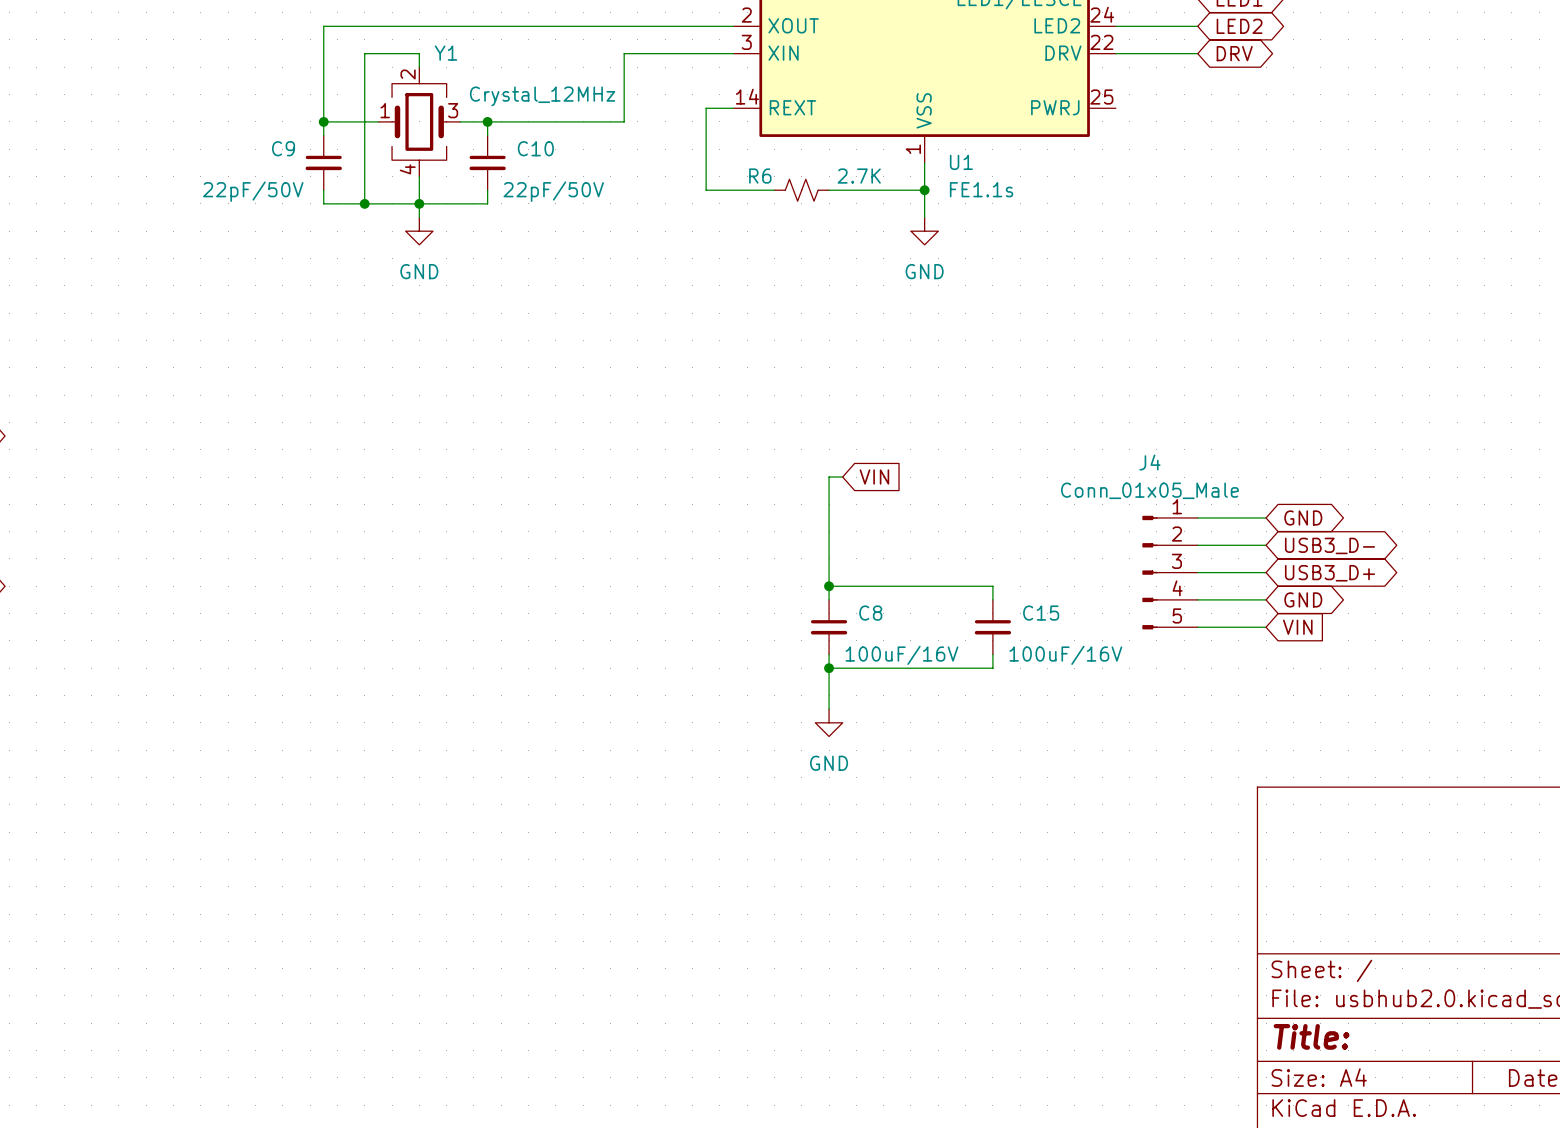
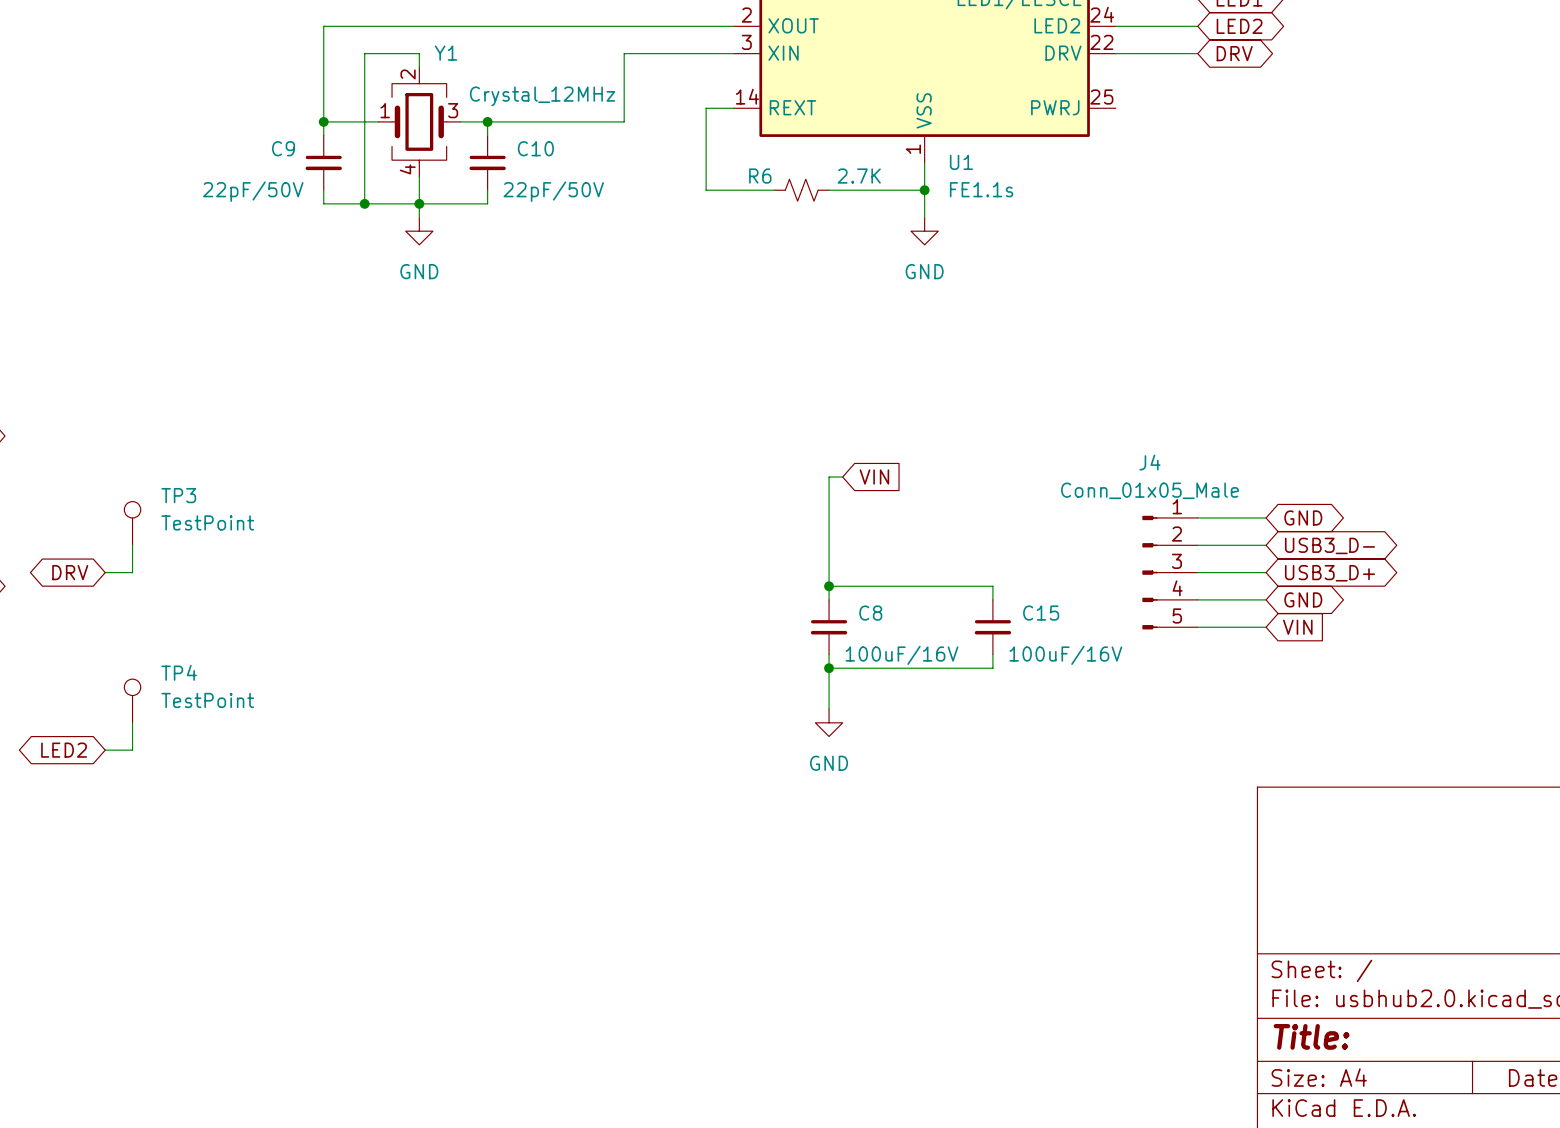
TP3: none -> TestPoint (132, 523)
wire: none -> (132, 545) (132, 572) (105, 572)
global label: none -> DRV (70, 572)
TP4: none -> TestPoint (132, 700)
wire: none -> (132, 722) (132, 750) (105, 750)
global label: none -> LED2 (64, 750)

